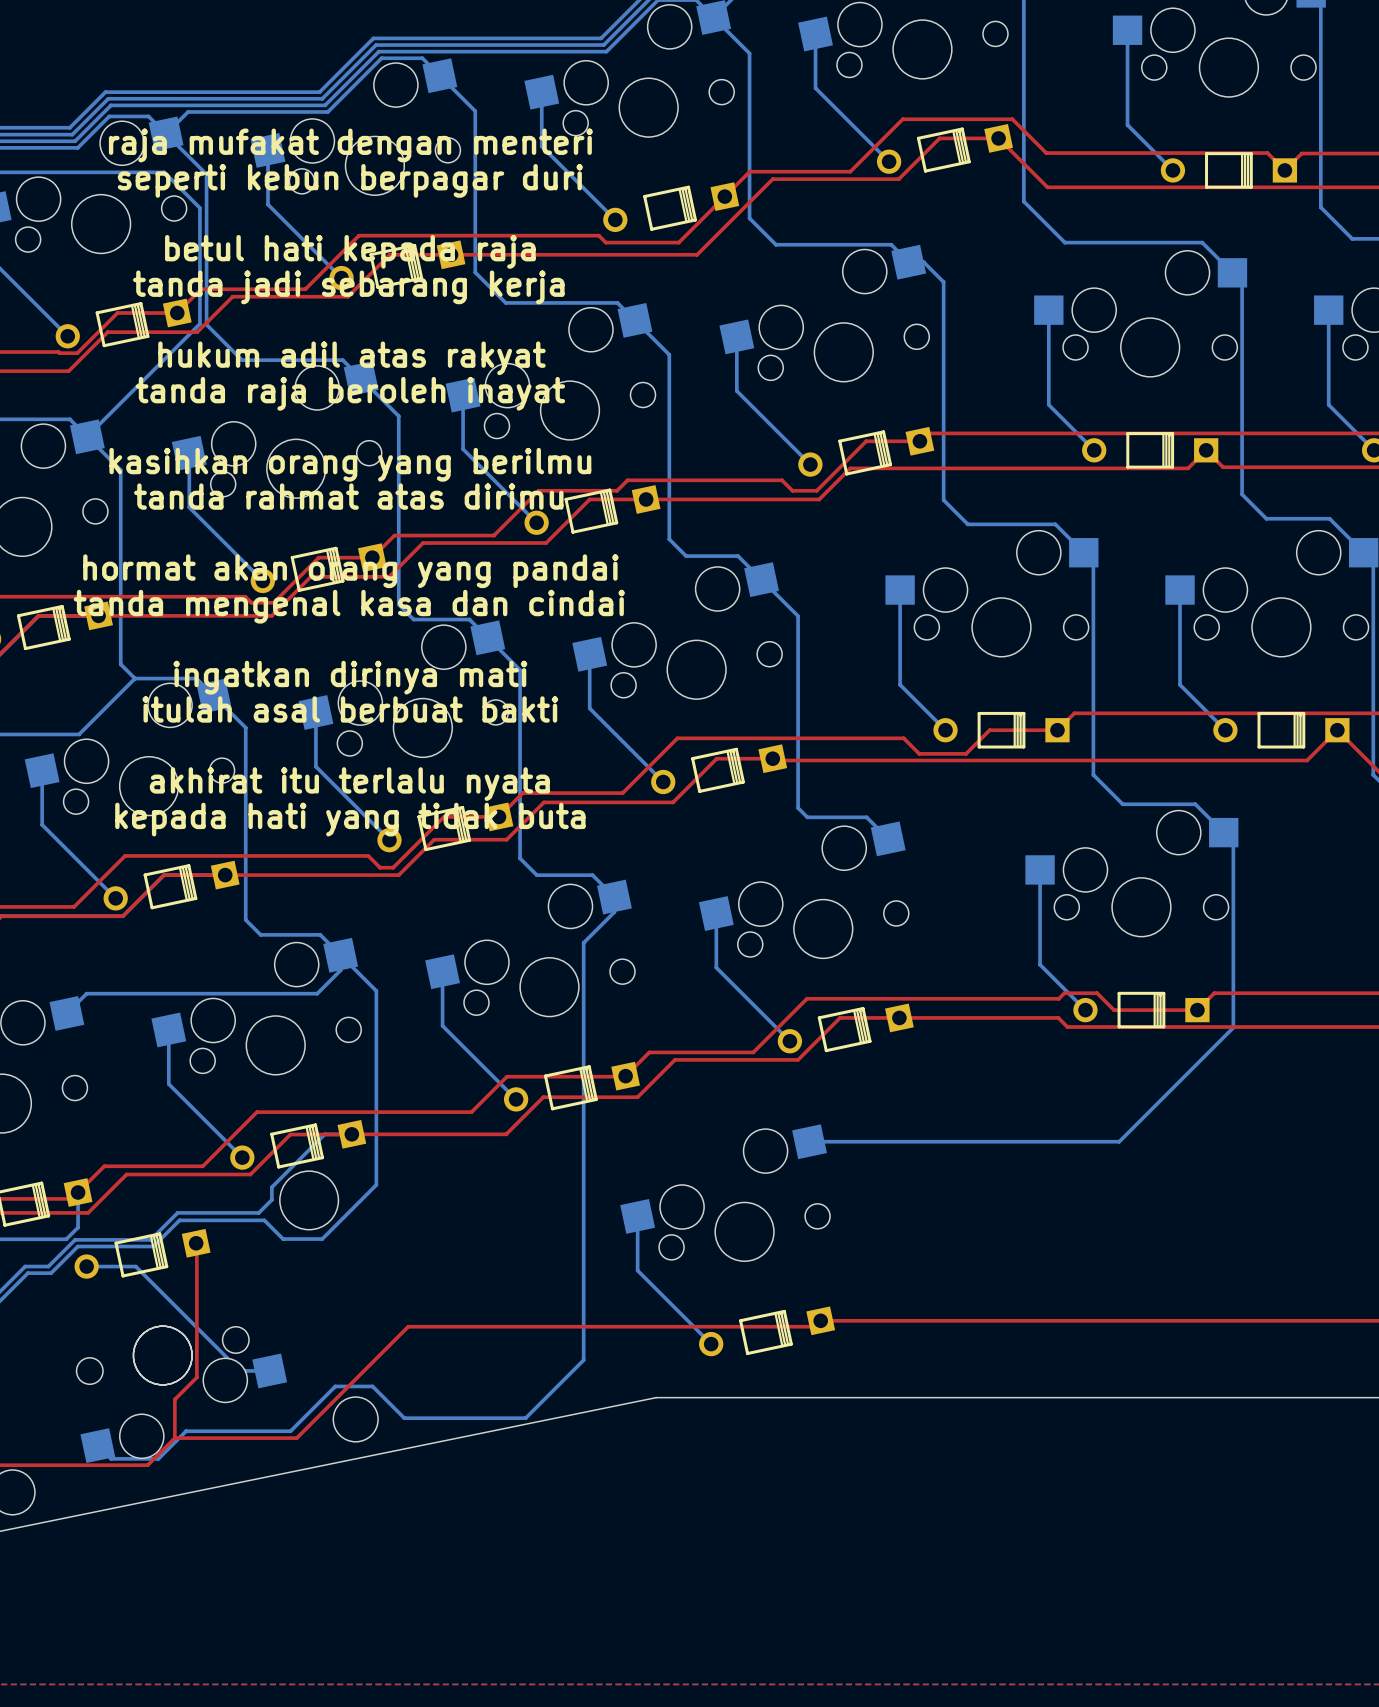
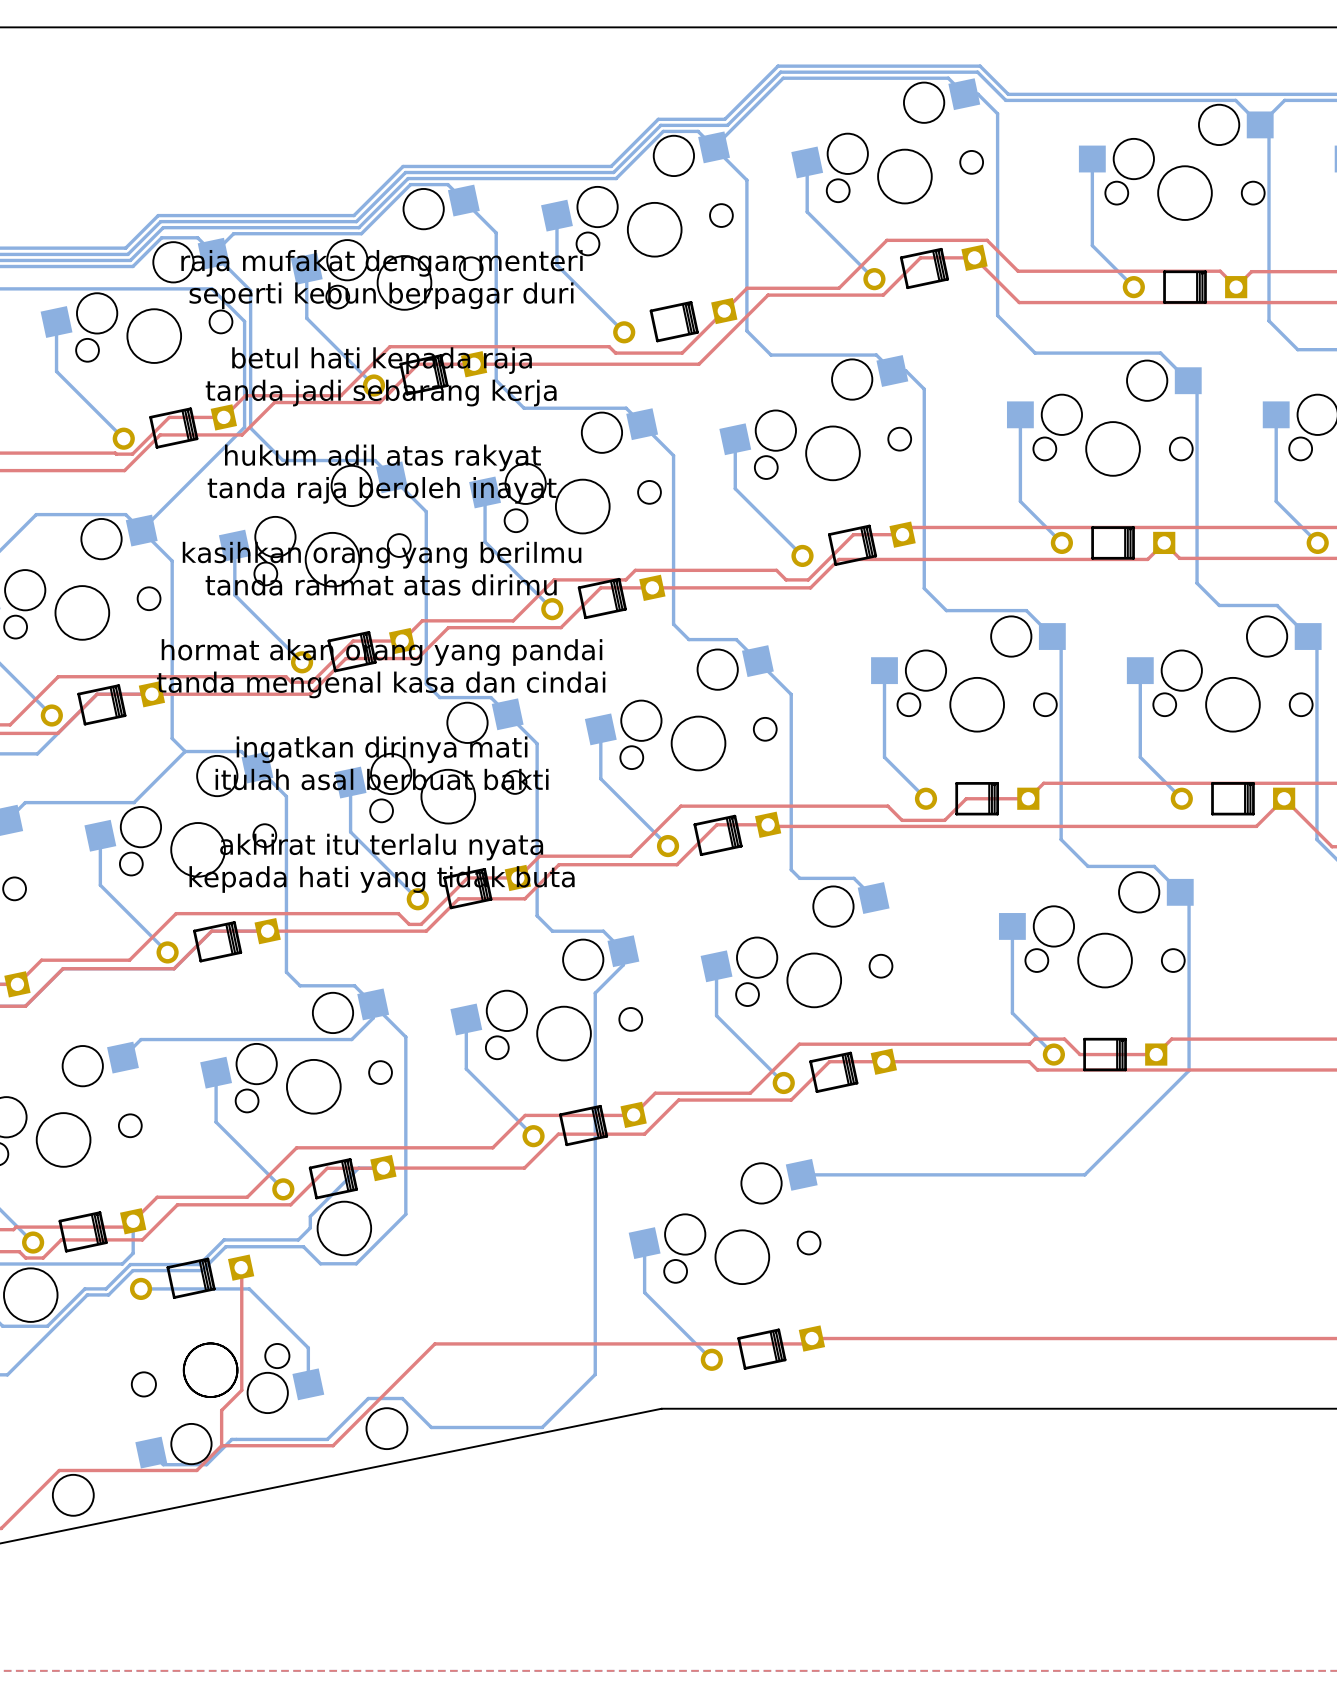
bottom track: (135, 1266) (240, 1370) (269, 1370) -> (185, 1288) (249, 1288) (308, 1347) (308, 1384)

